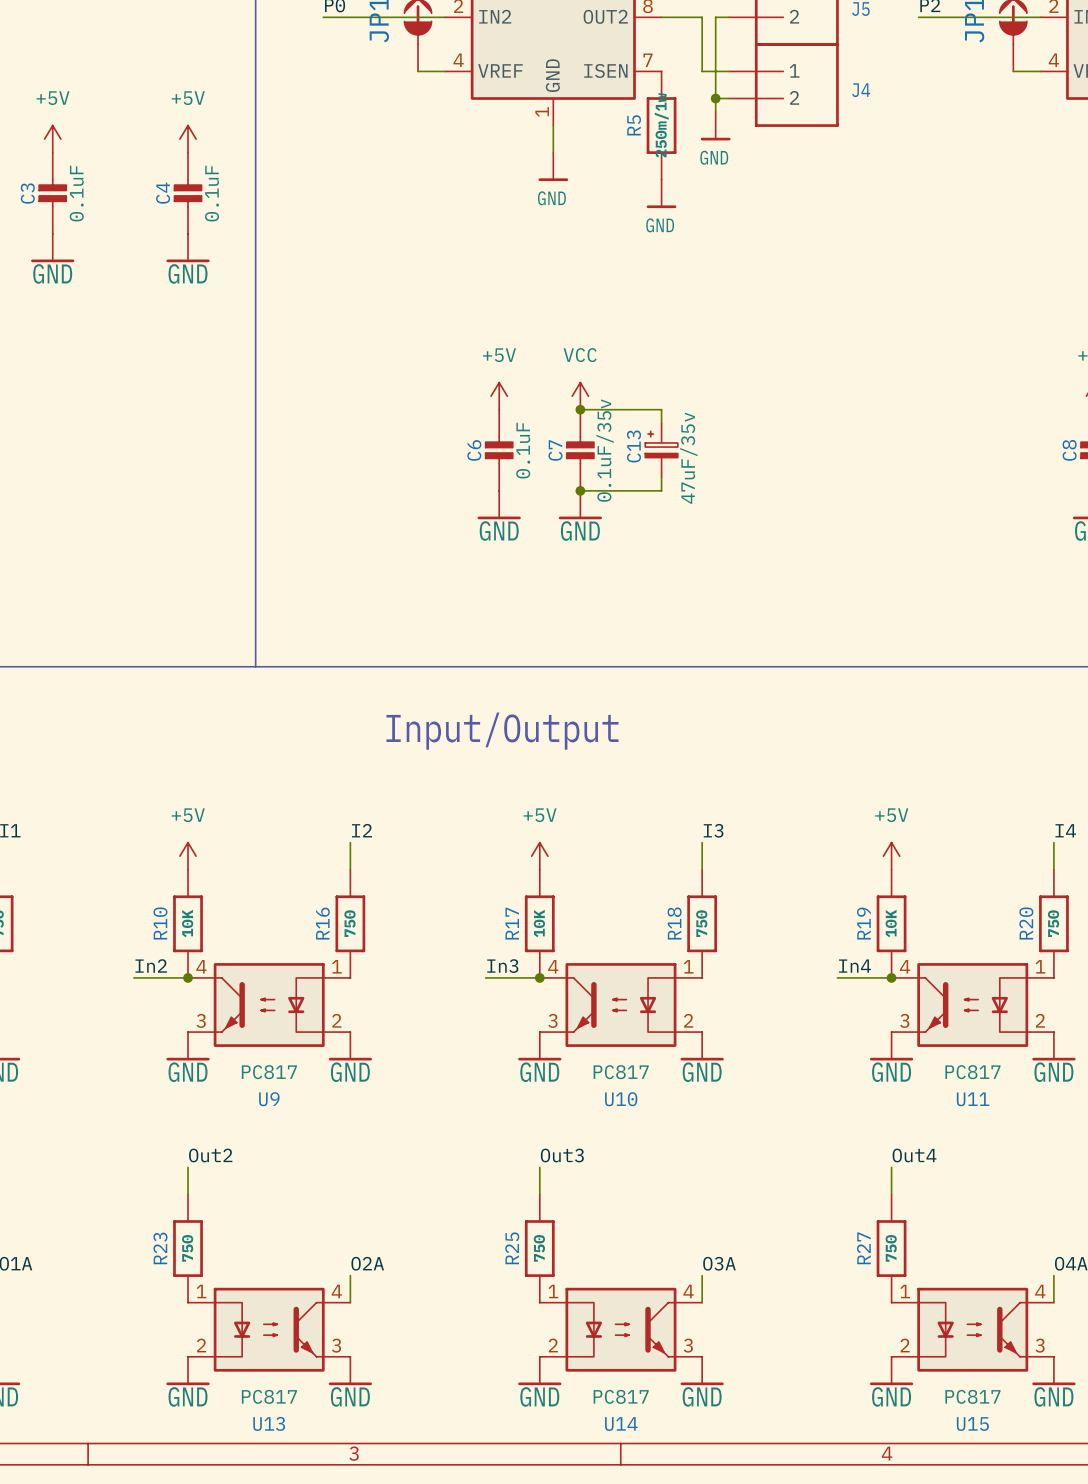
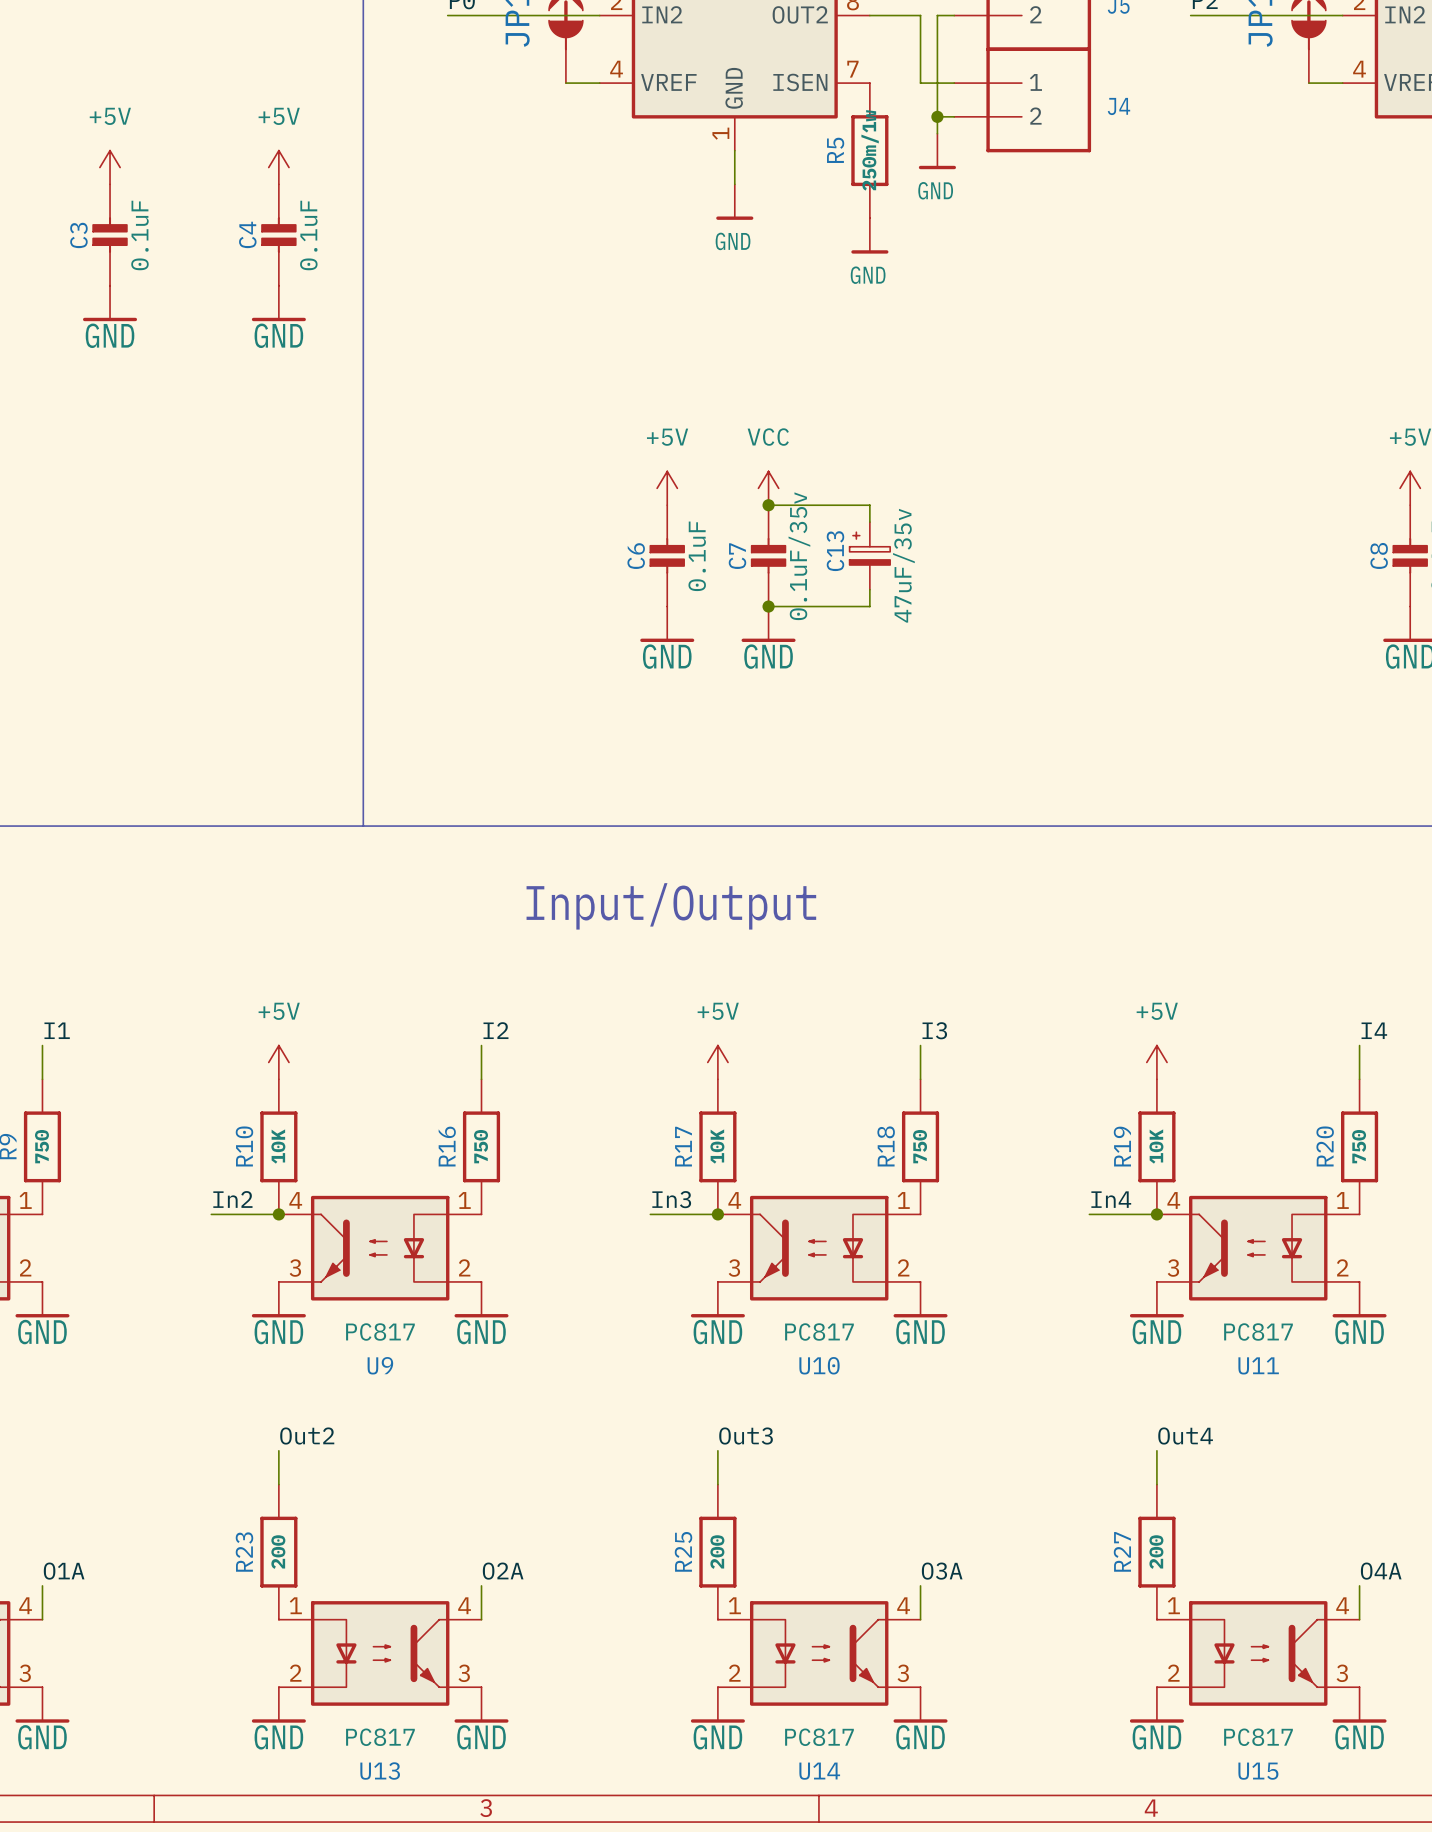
R23 value: 750 (187, 1248) -> 200 (278, 1552)
R25 value: 750 (539, 1248) -> 200 (717, 1552)
R27 value: 750 (891, 1248) -> 200 (1156, 1552)

